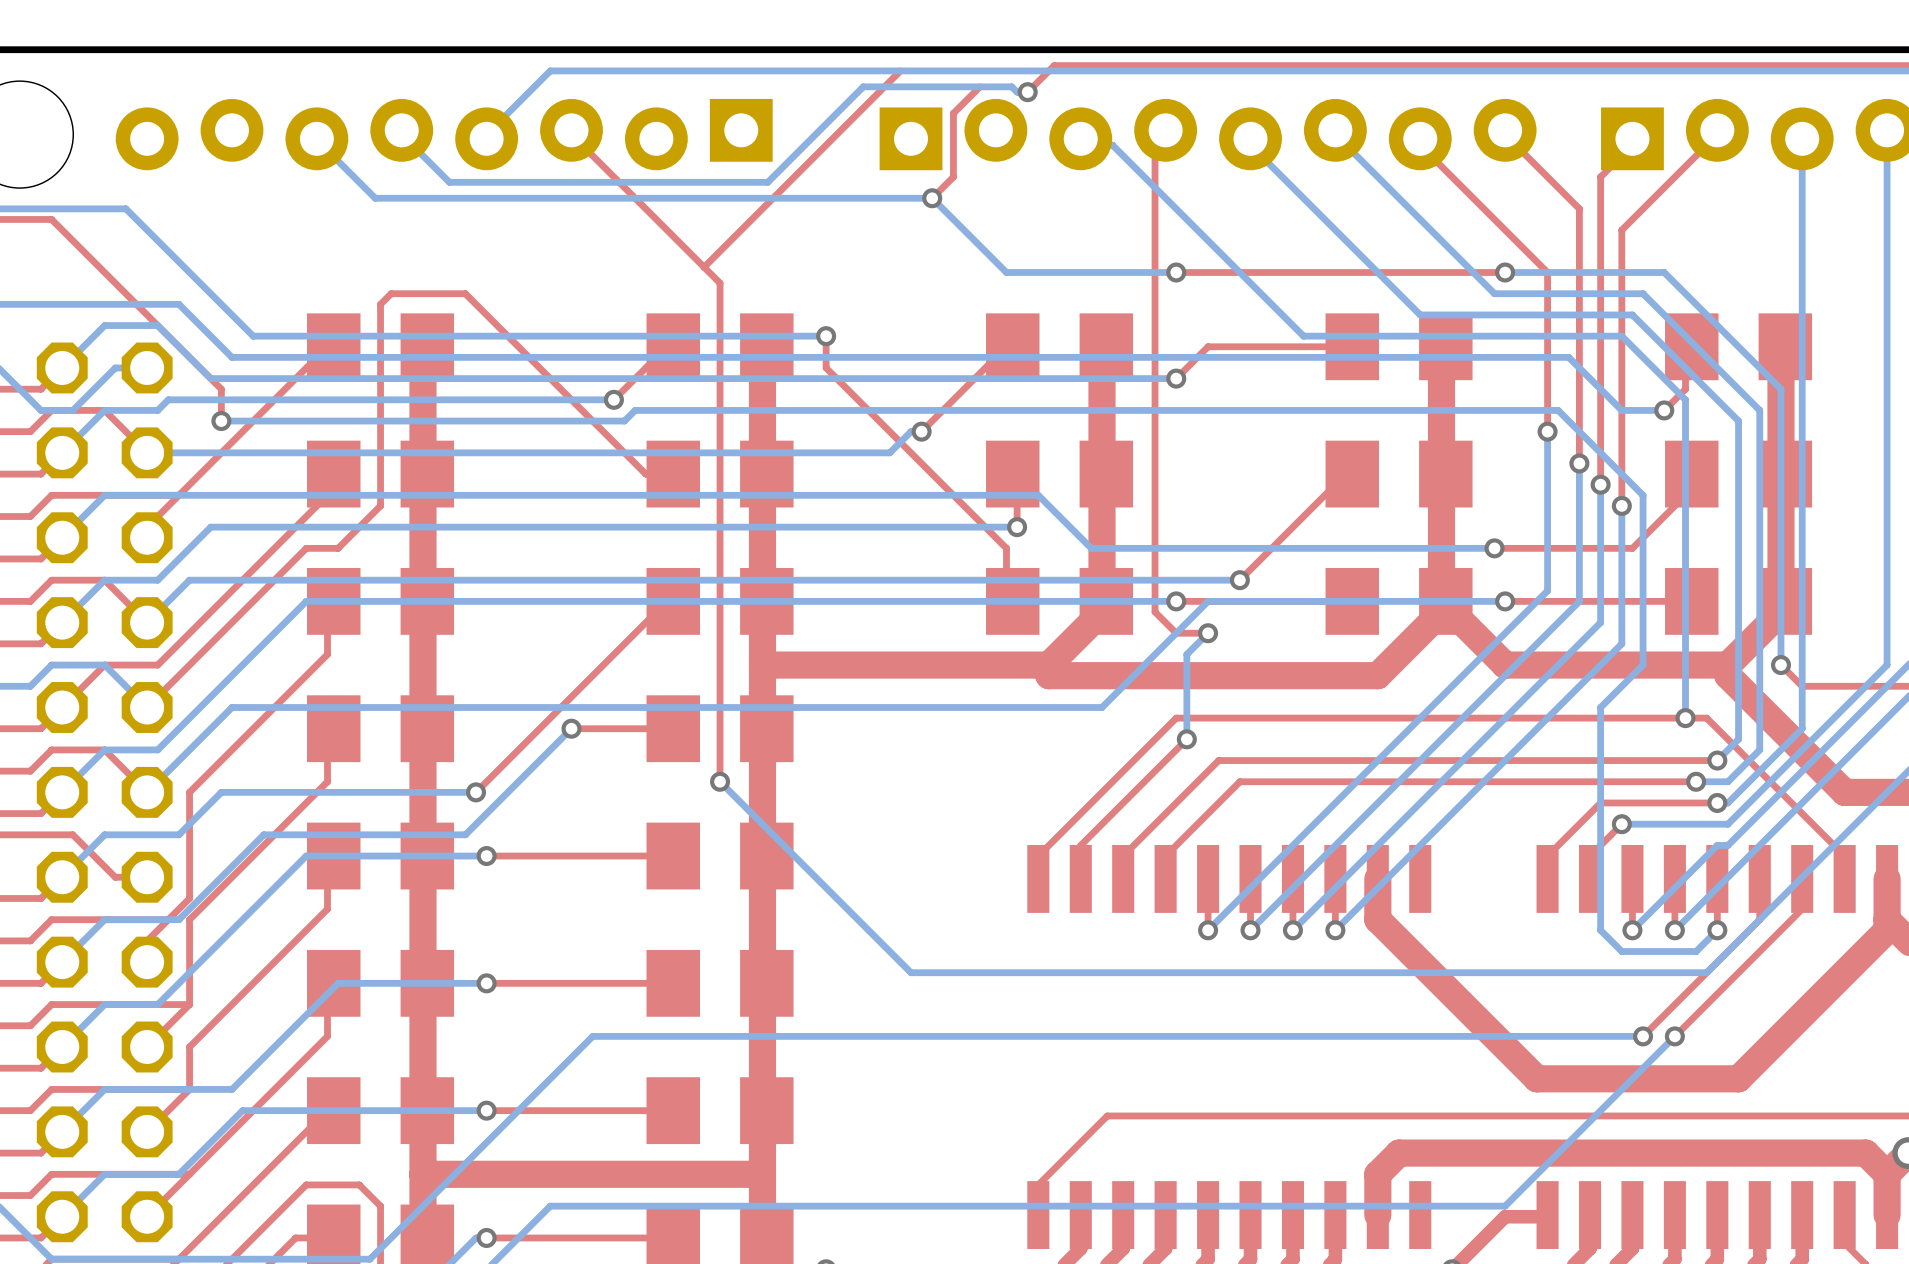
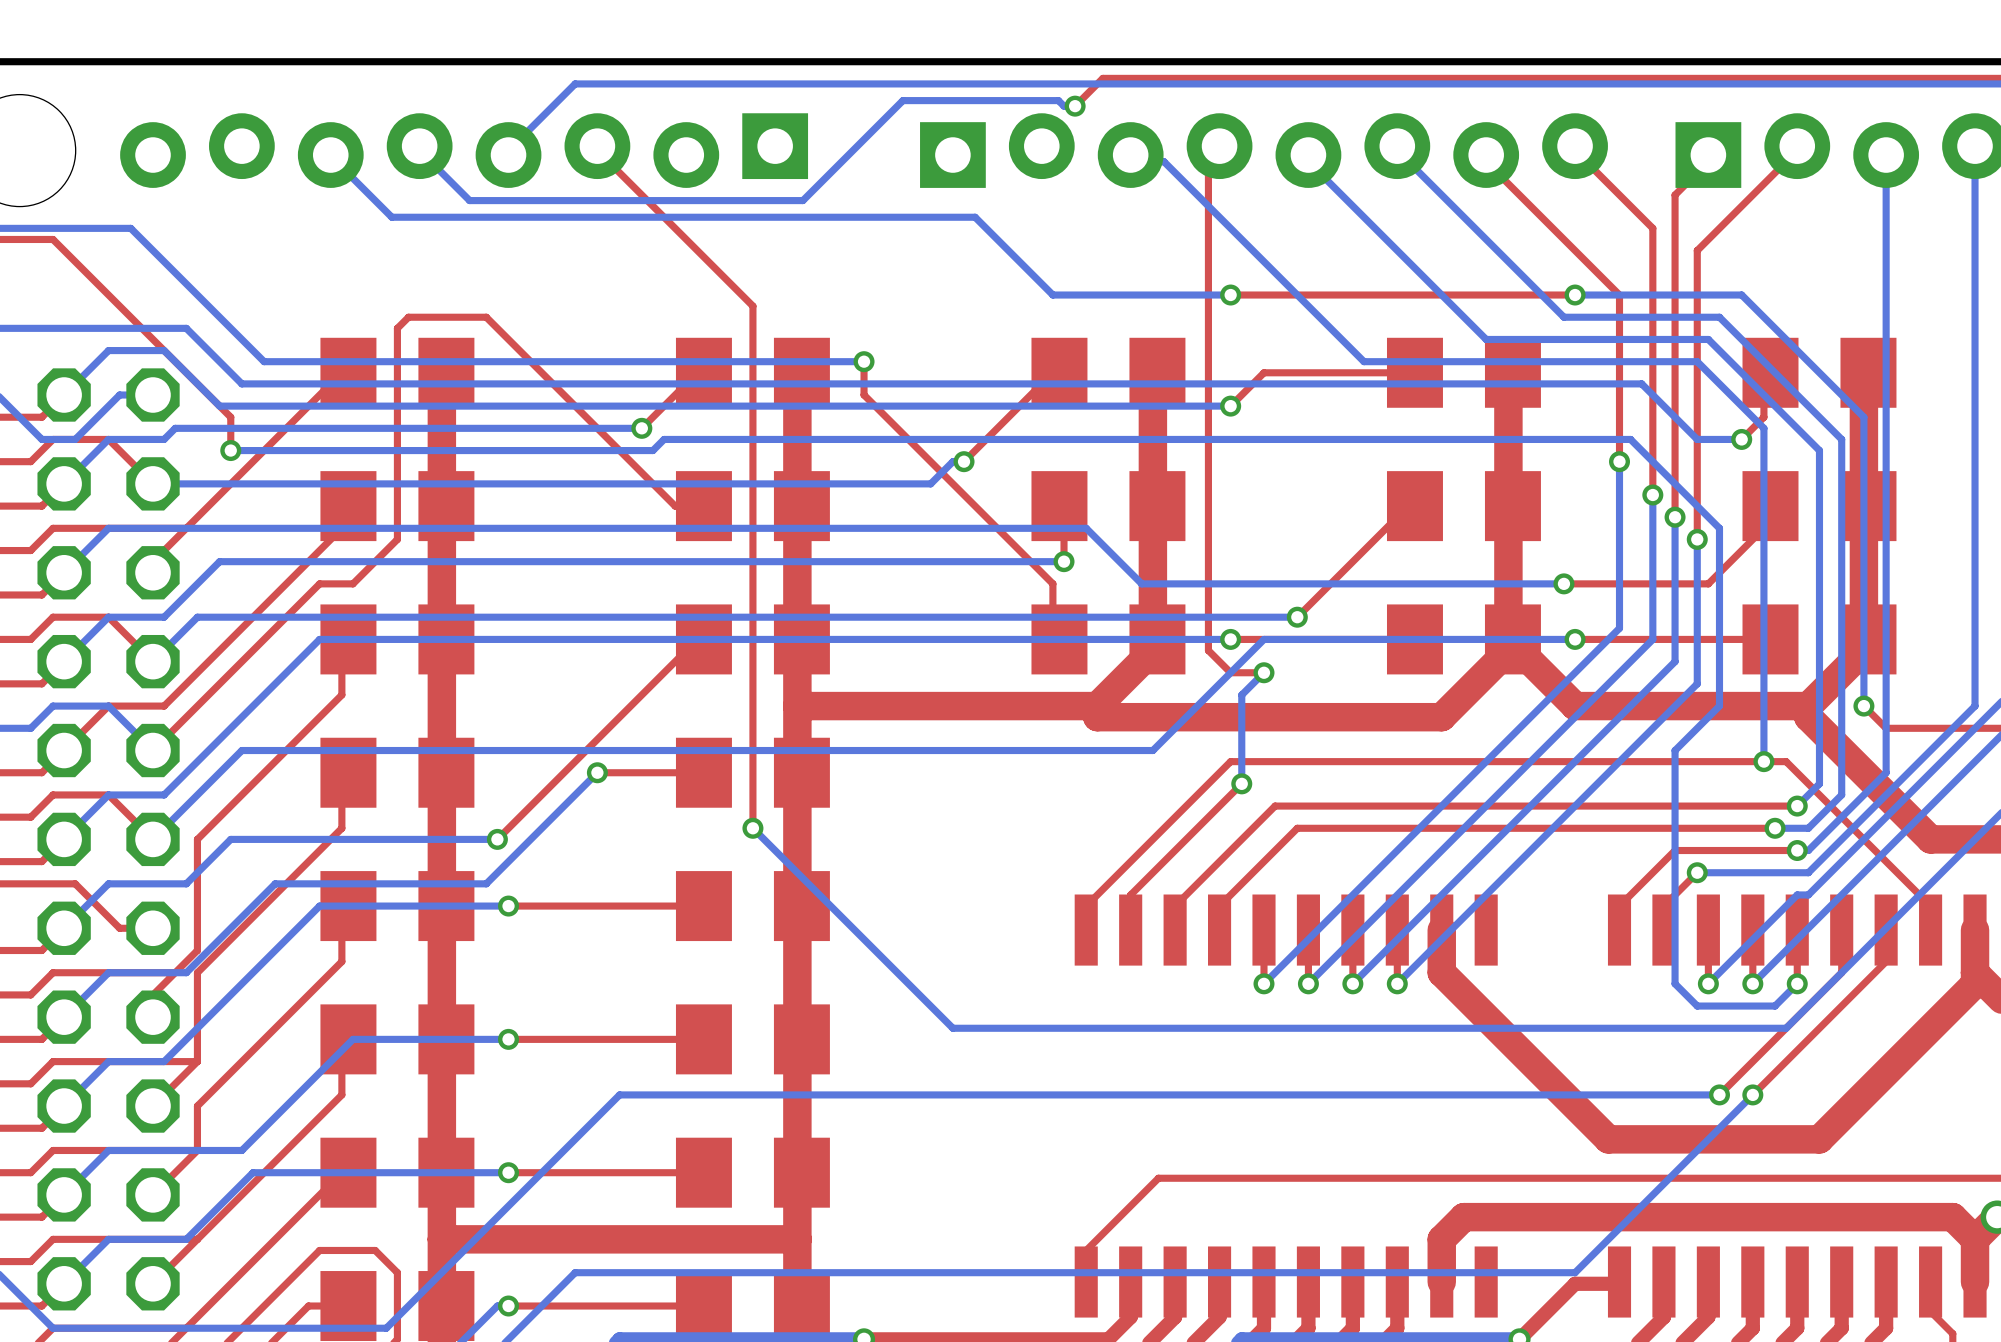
top track: (900, 70) (704, 267) -> none
top track: (979, 86) (953, 113) (953, 177) (932, 198) -> none
via: (932, 198) -> none

